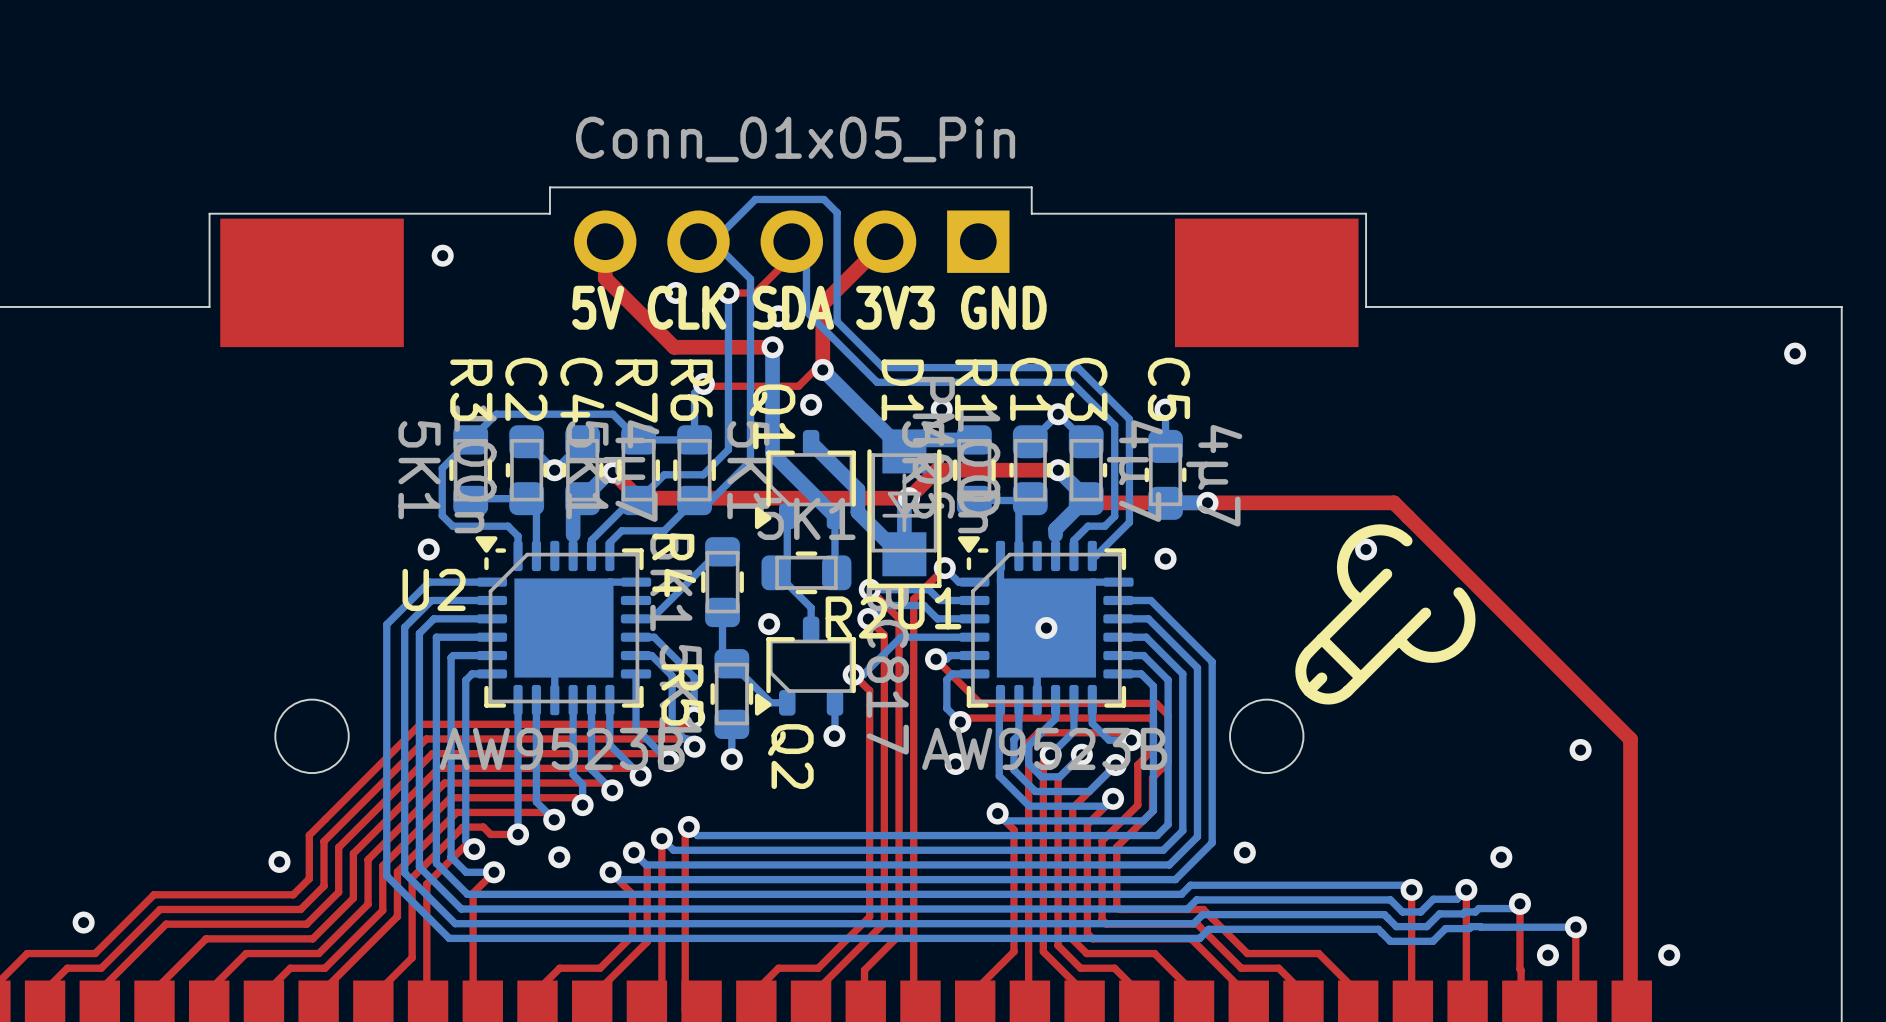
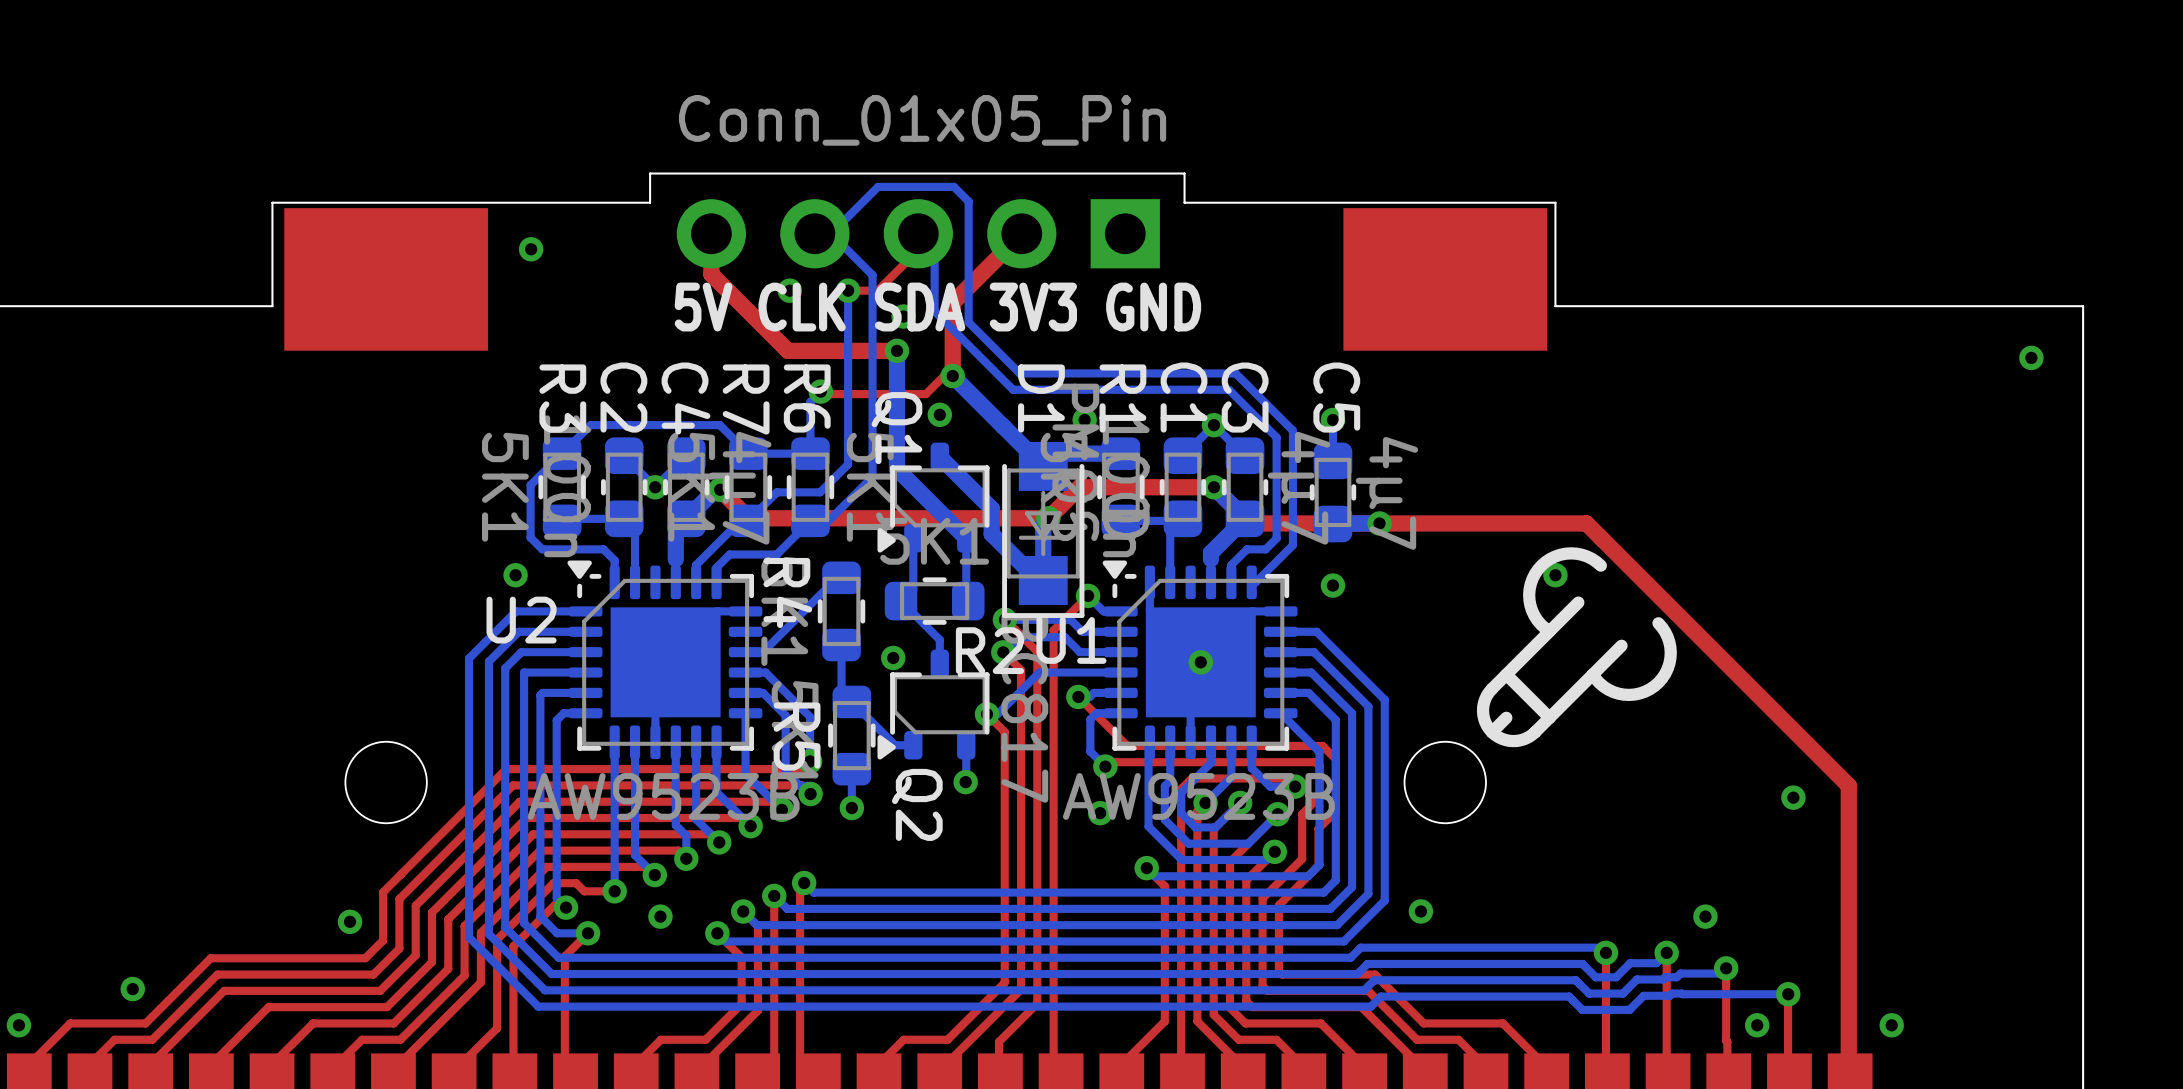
bottom track: (1118, 673) (1141, 673) (1153, 686) (1153, 708) -> (1280, 713) (1319, 752)

